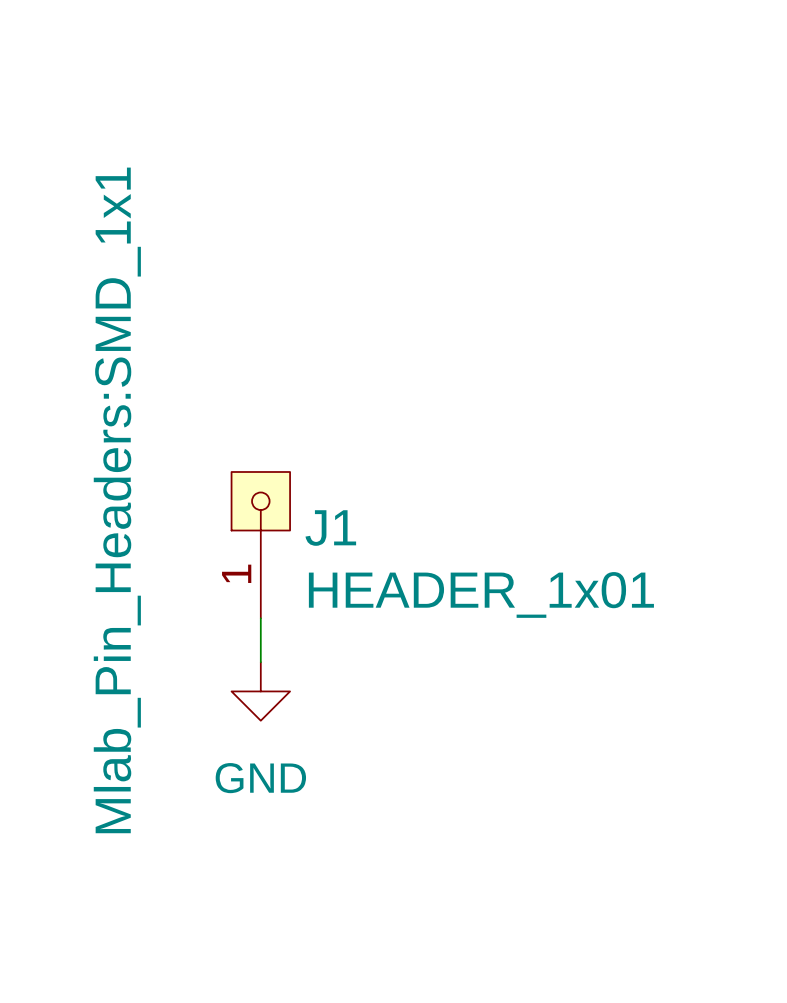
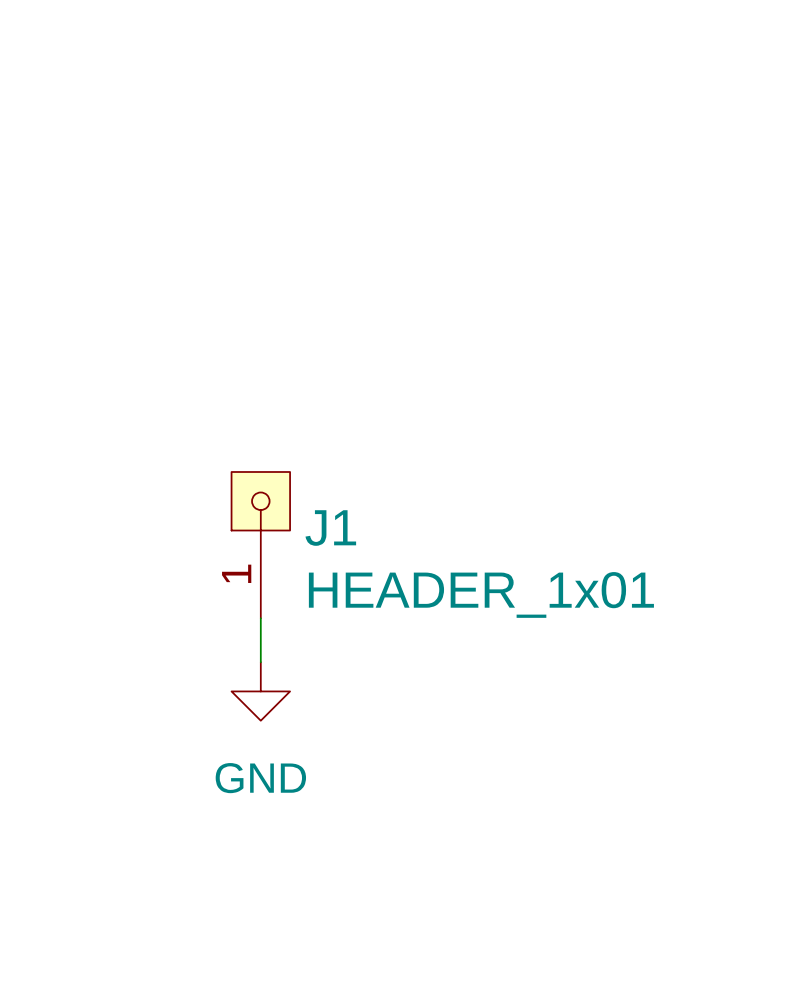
J1 text: Mlab_Pin_Headers:SMD_1x1 (117, 500) -> none

